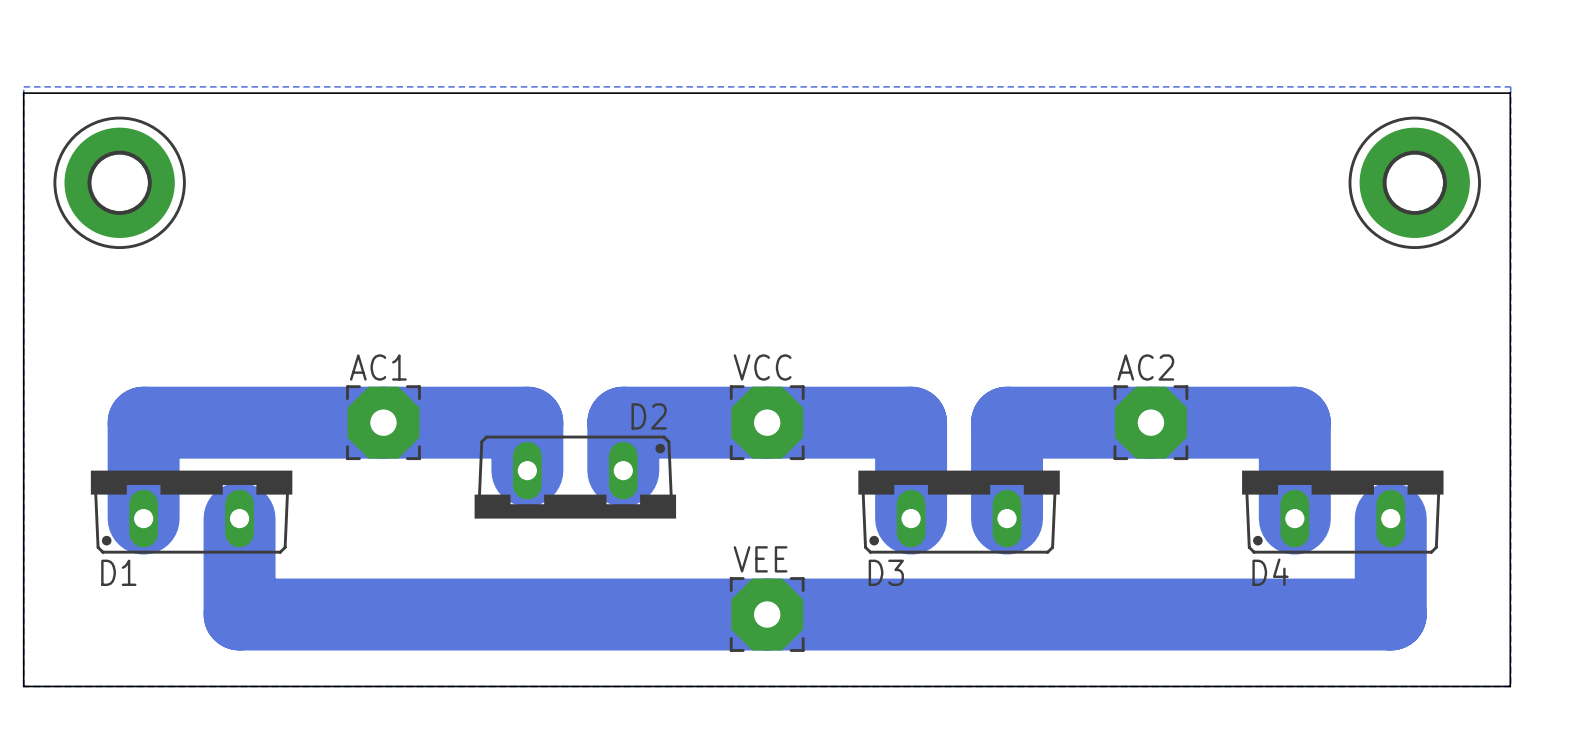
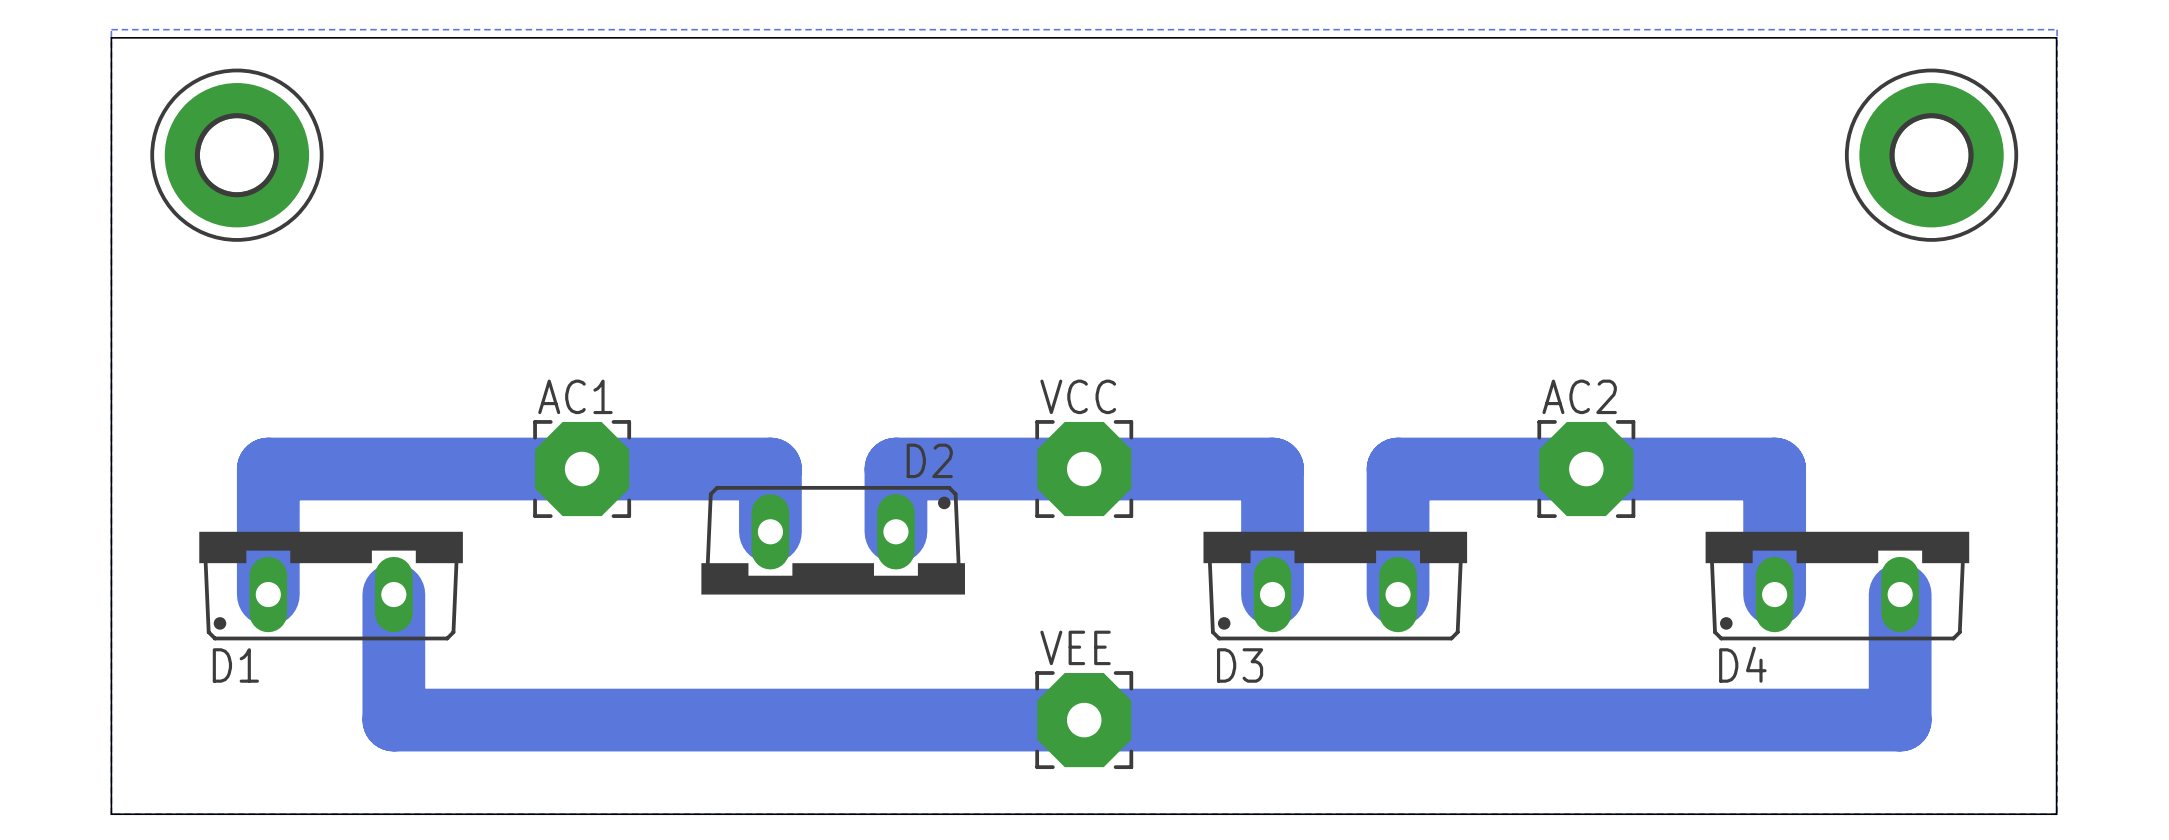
bottom track width: thick (527, 470) (527, 422) (143, 422) (143, 518) -> thin (770, 531) (770, 469) (268, 469) (268, 594)
bottom track width: thick (623, 470) (623, 422) (911, 422) (911, 518) -> thin (895, 531) (895, 469) (1272, 469) (1272, 594)
bottom track width: thick (239, 518) (239, 614) (1390, 614) (1390, 518) -> thin (393, 594) (393, 720) (1900, 720) (1900, 594)
bottom track width: thick (1007, 518) (1007, 422) (1294, 422) (1294, 518) -> thin (1398, 594) (1398, 469) (1774, 469) (1774, 594)

